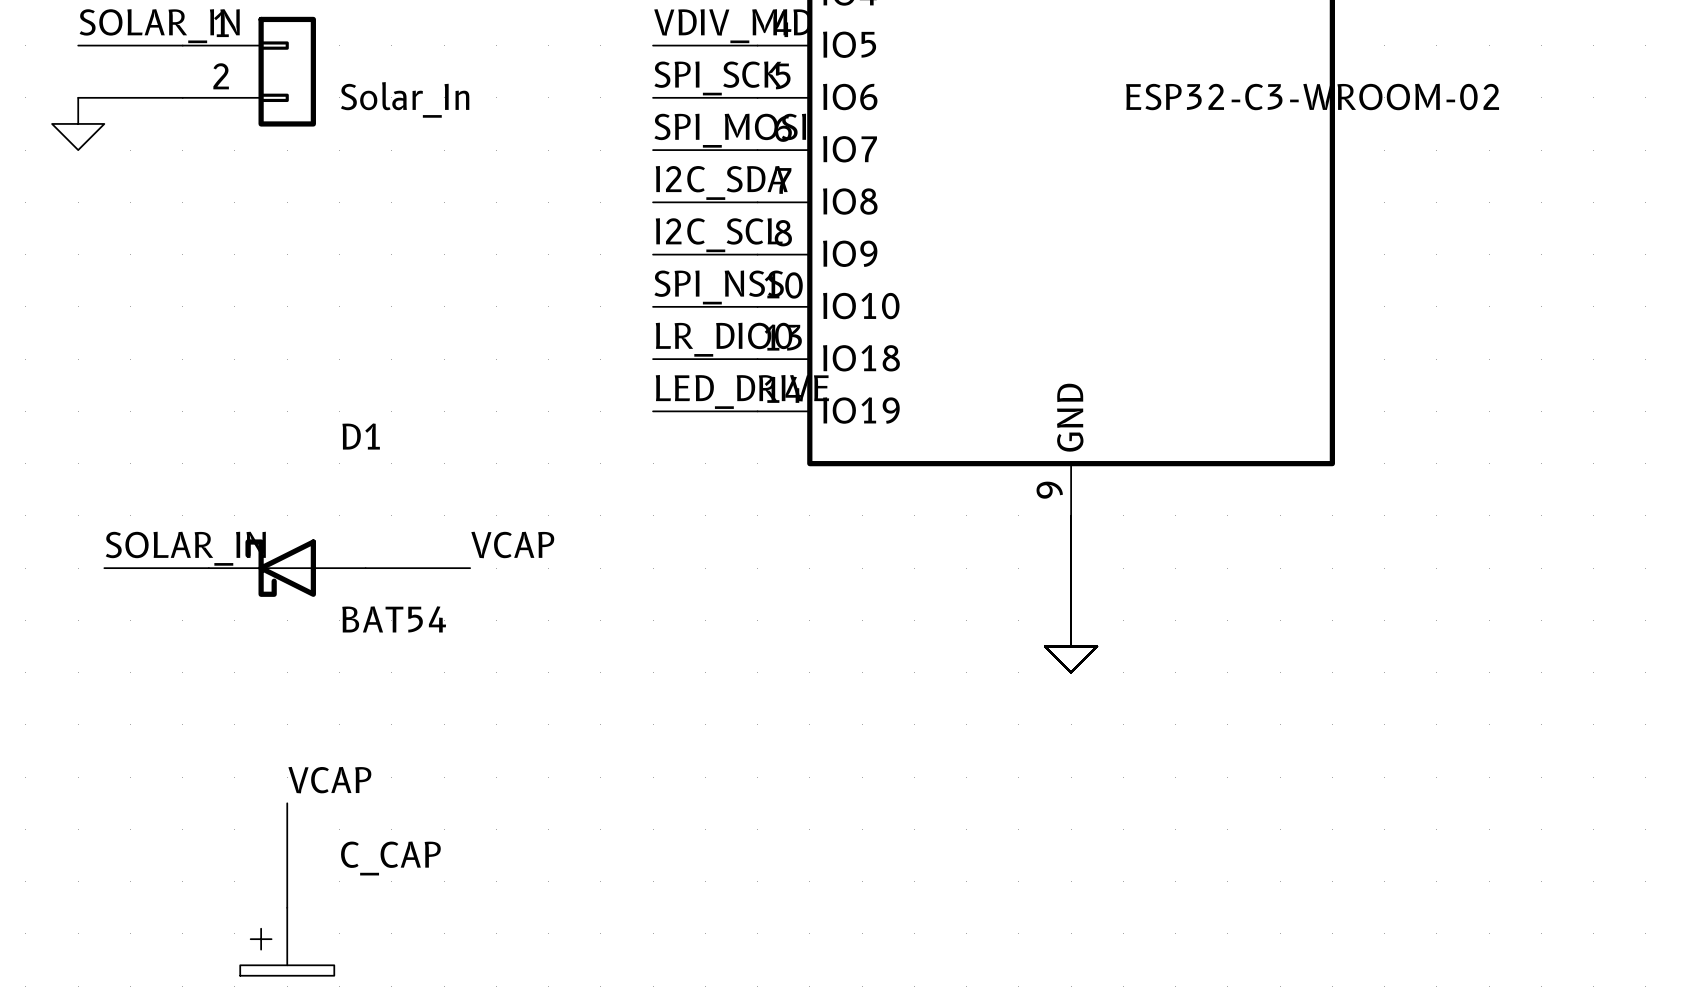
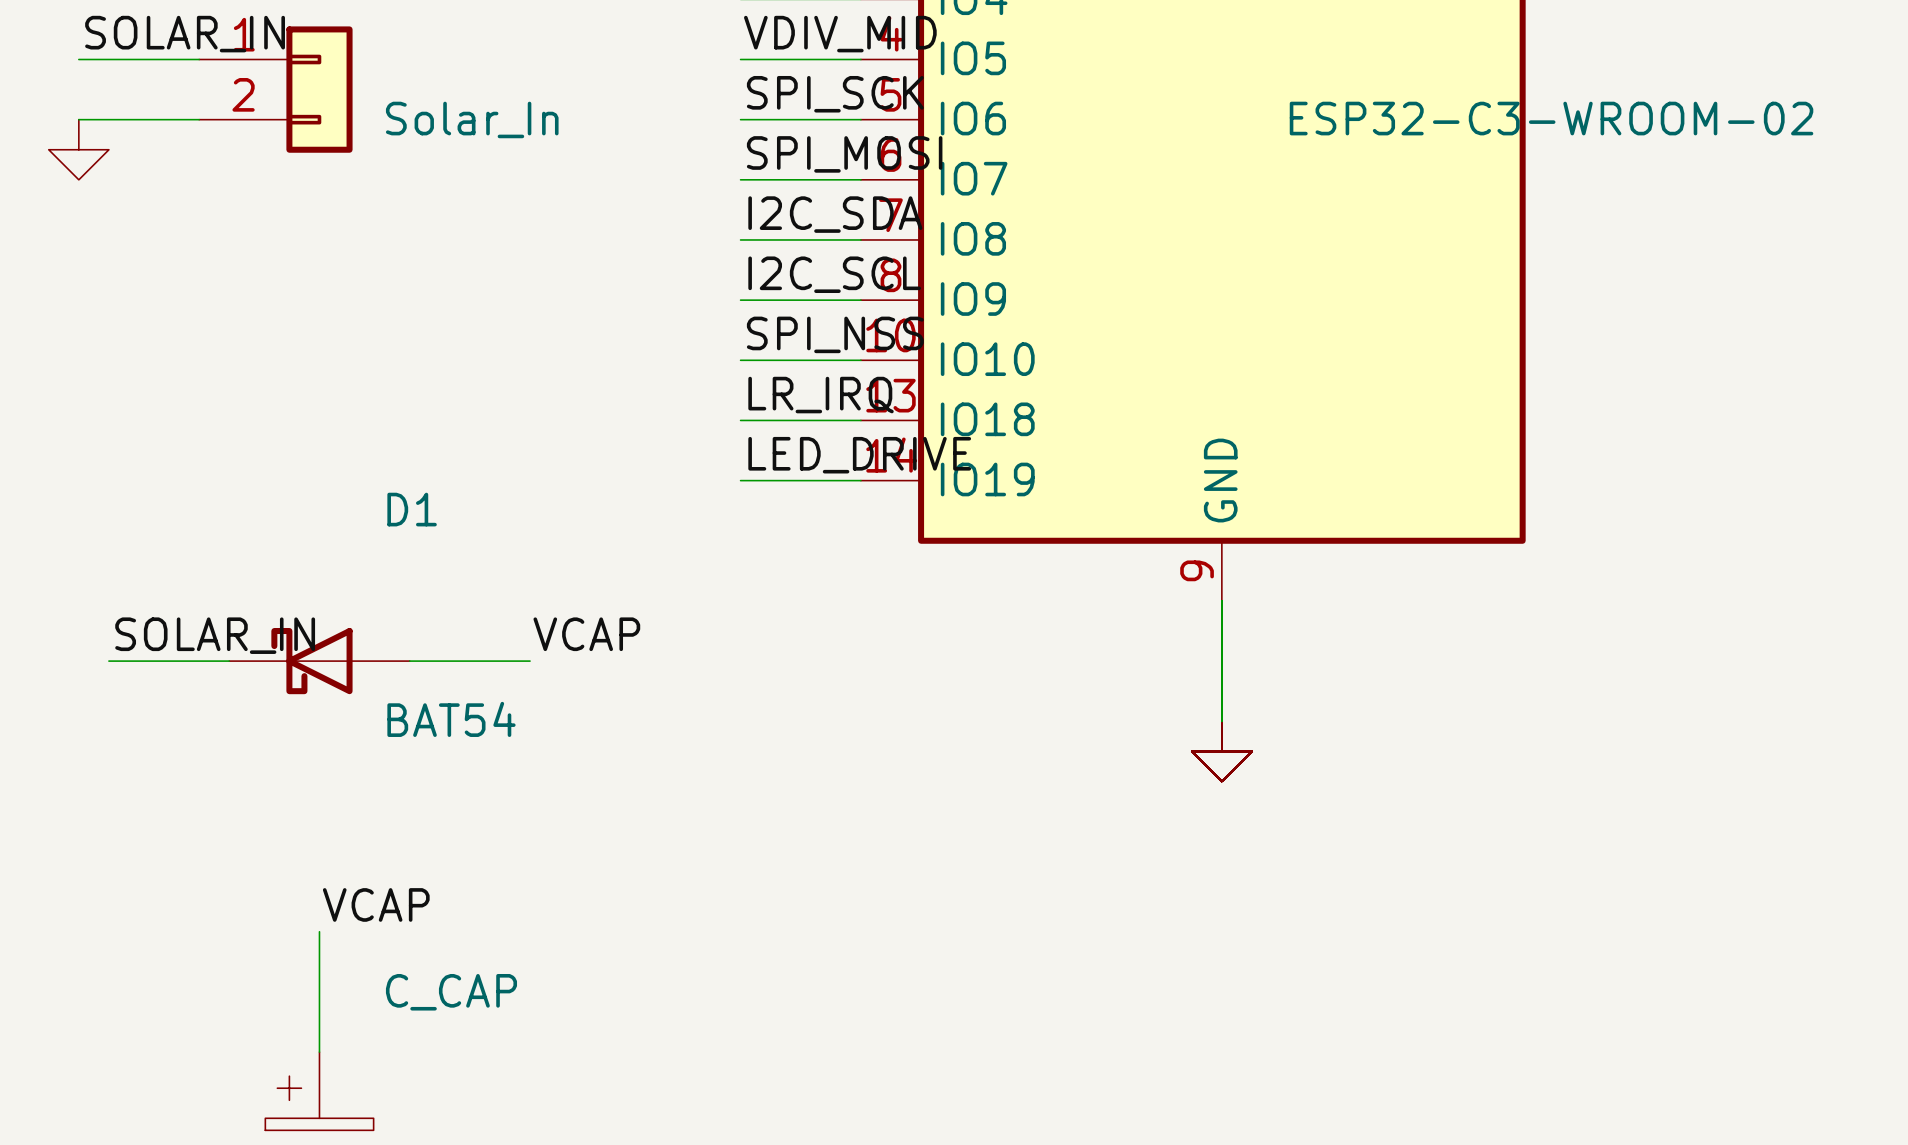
label: LR_DIO0 (724, 339) -> LR_IRQ (821, 395)

